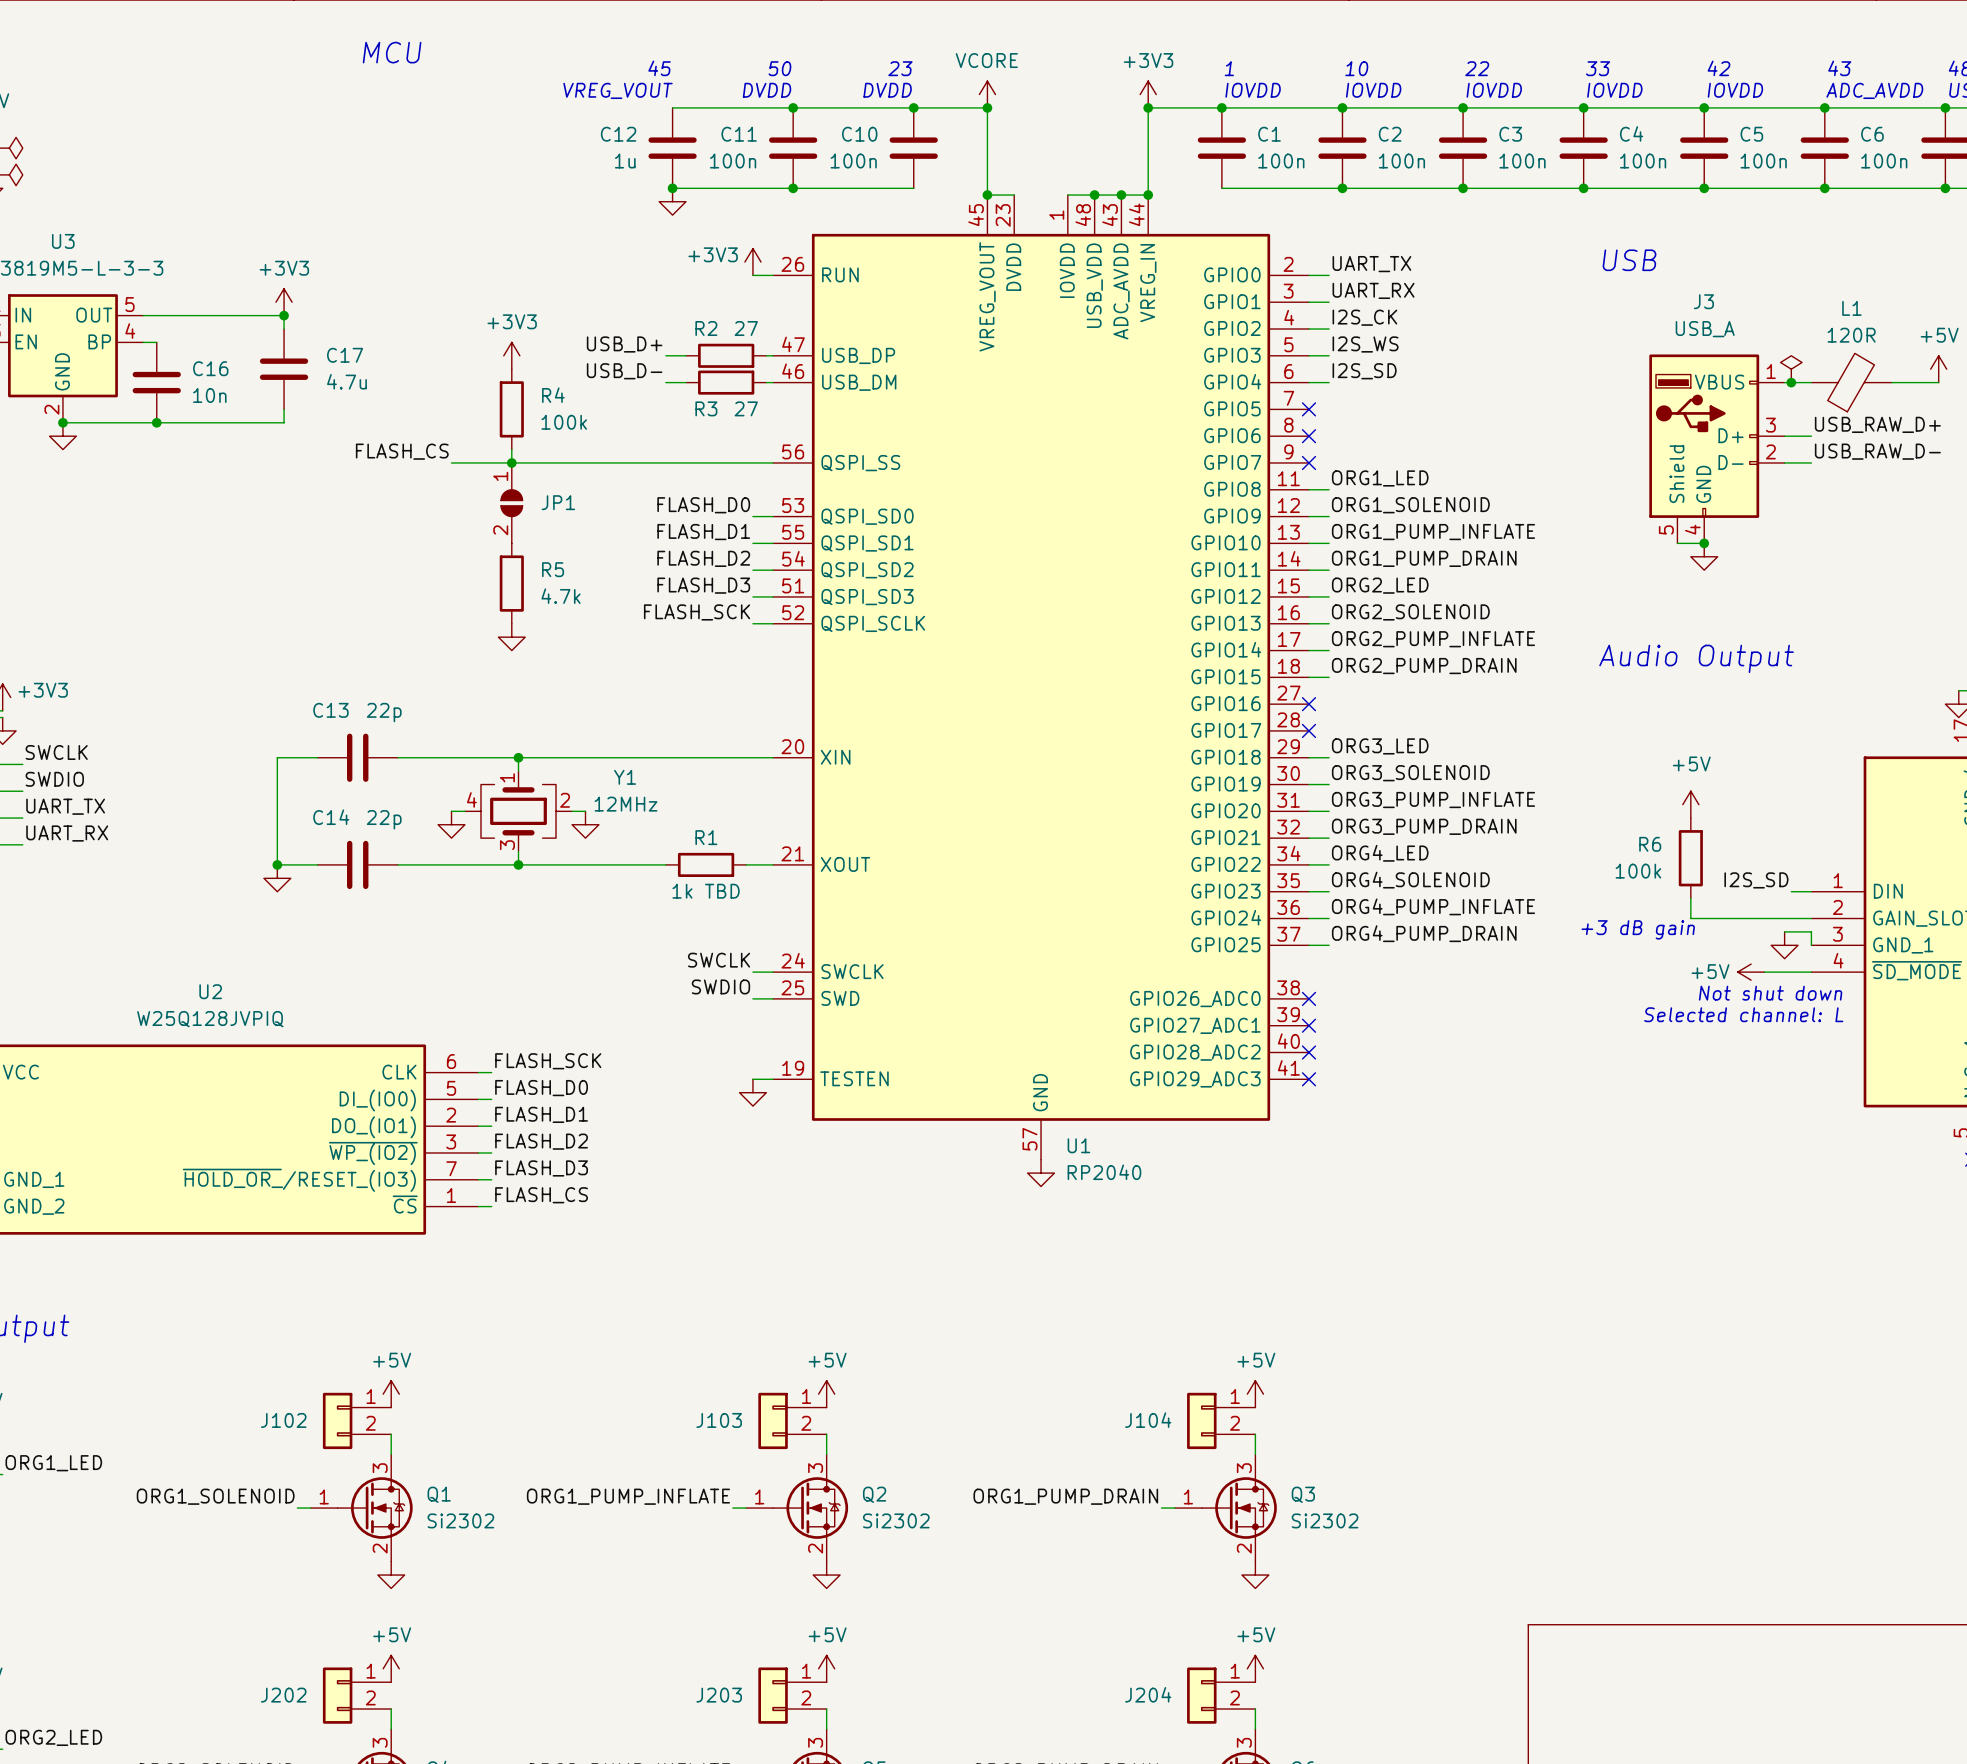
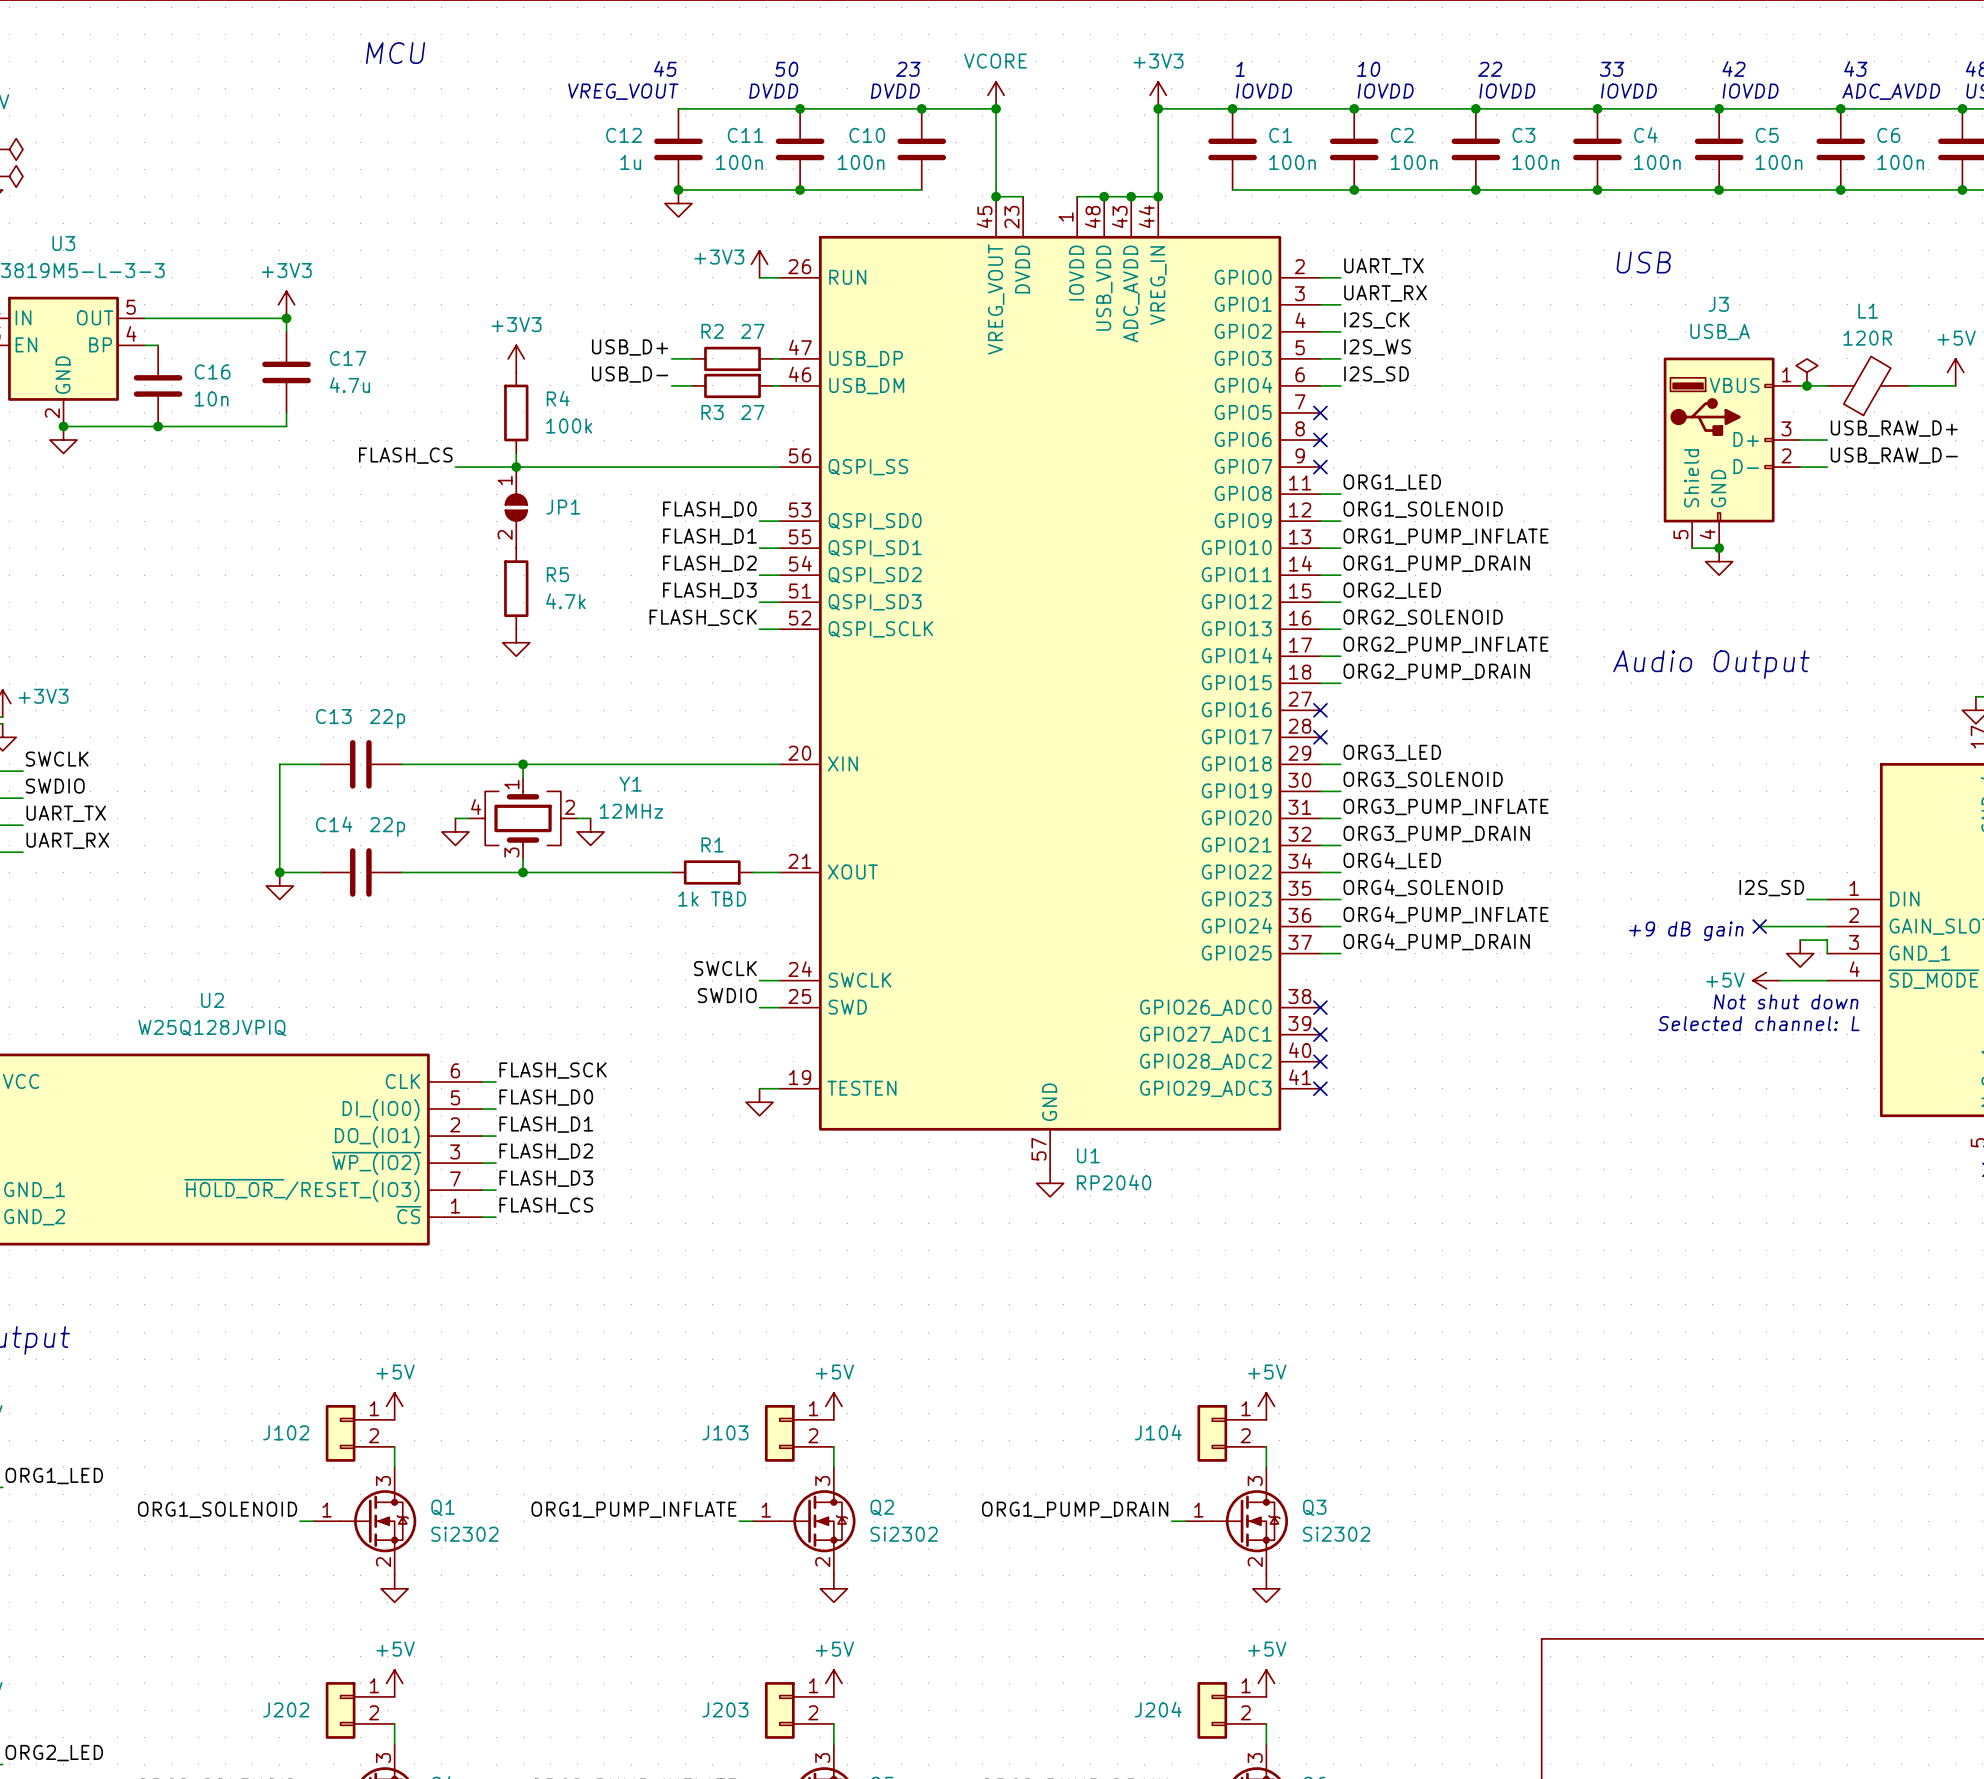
power symbol: +5V (1690, 804) -> none
R6: 100k (1690, 858) -> none
wire: (1690, 898) (1690, 918) (1744, 918) -> none
no-connect mark: none -> (1759, 926)
text: +3 dB gain (1638, 929) -> +9 dB gain (1686, 931)

